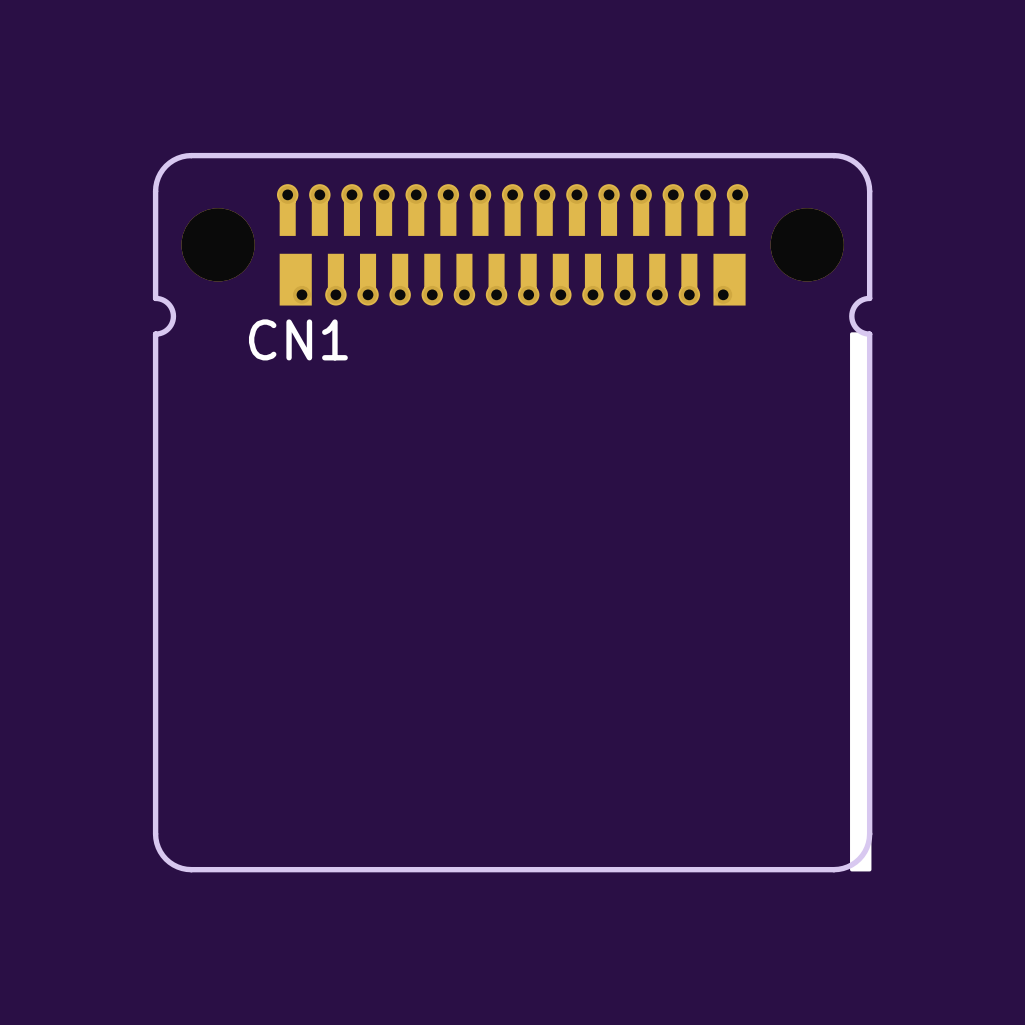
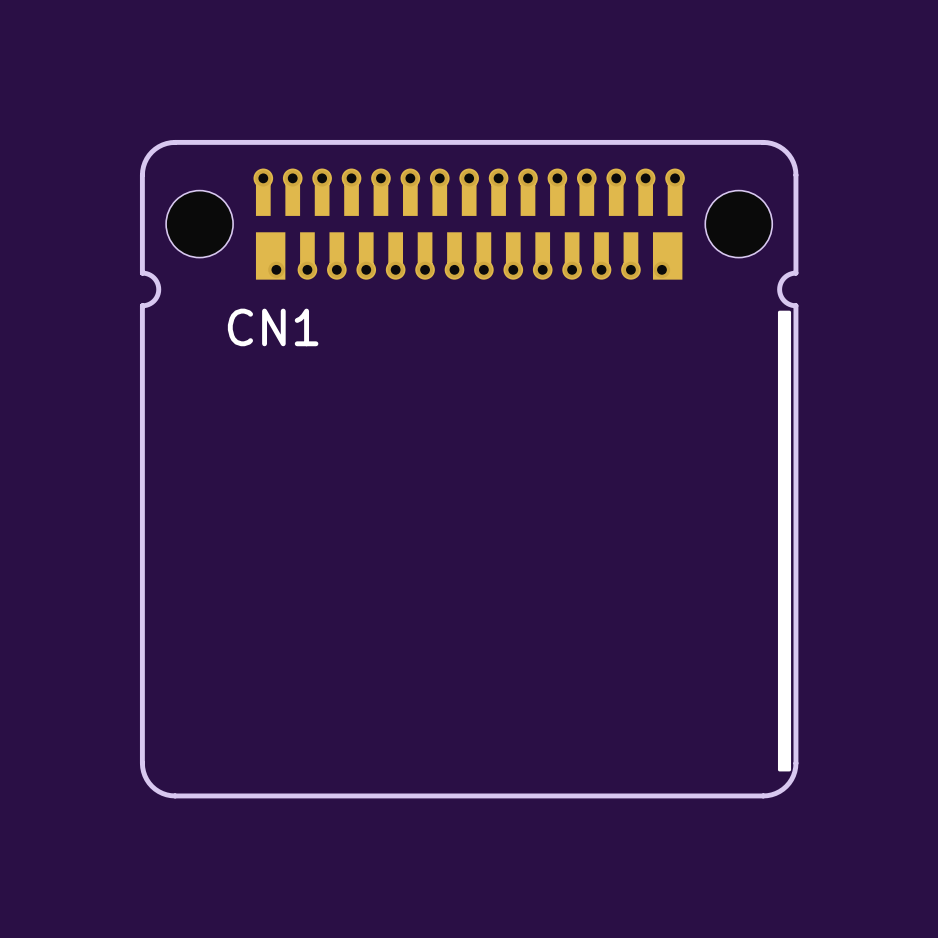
CN1 footprint: [181, 184, 844, 306] -> [166, 168, 773, 280]
drawing shape: [850, 332, 872, 872] -> [777, 310, 792, 772]

